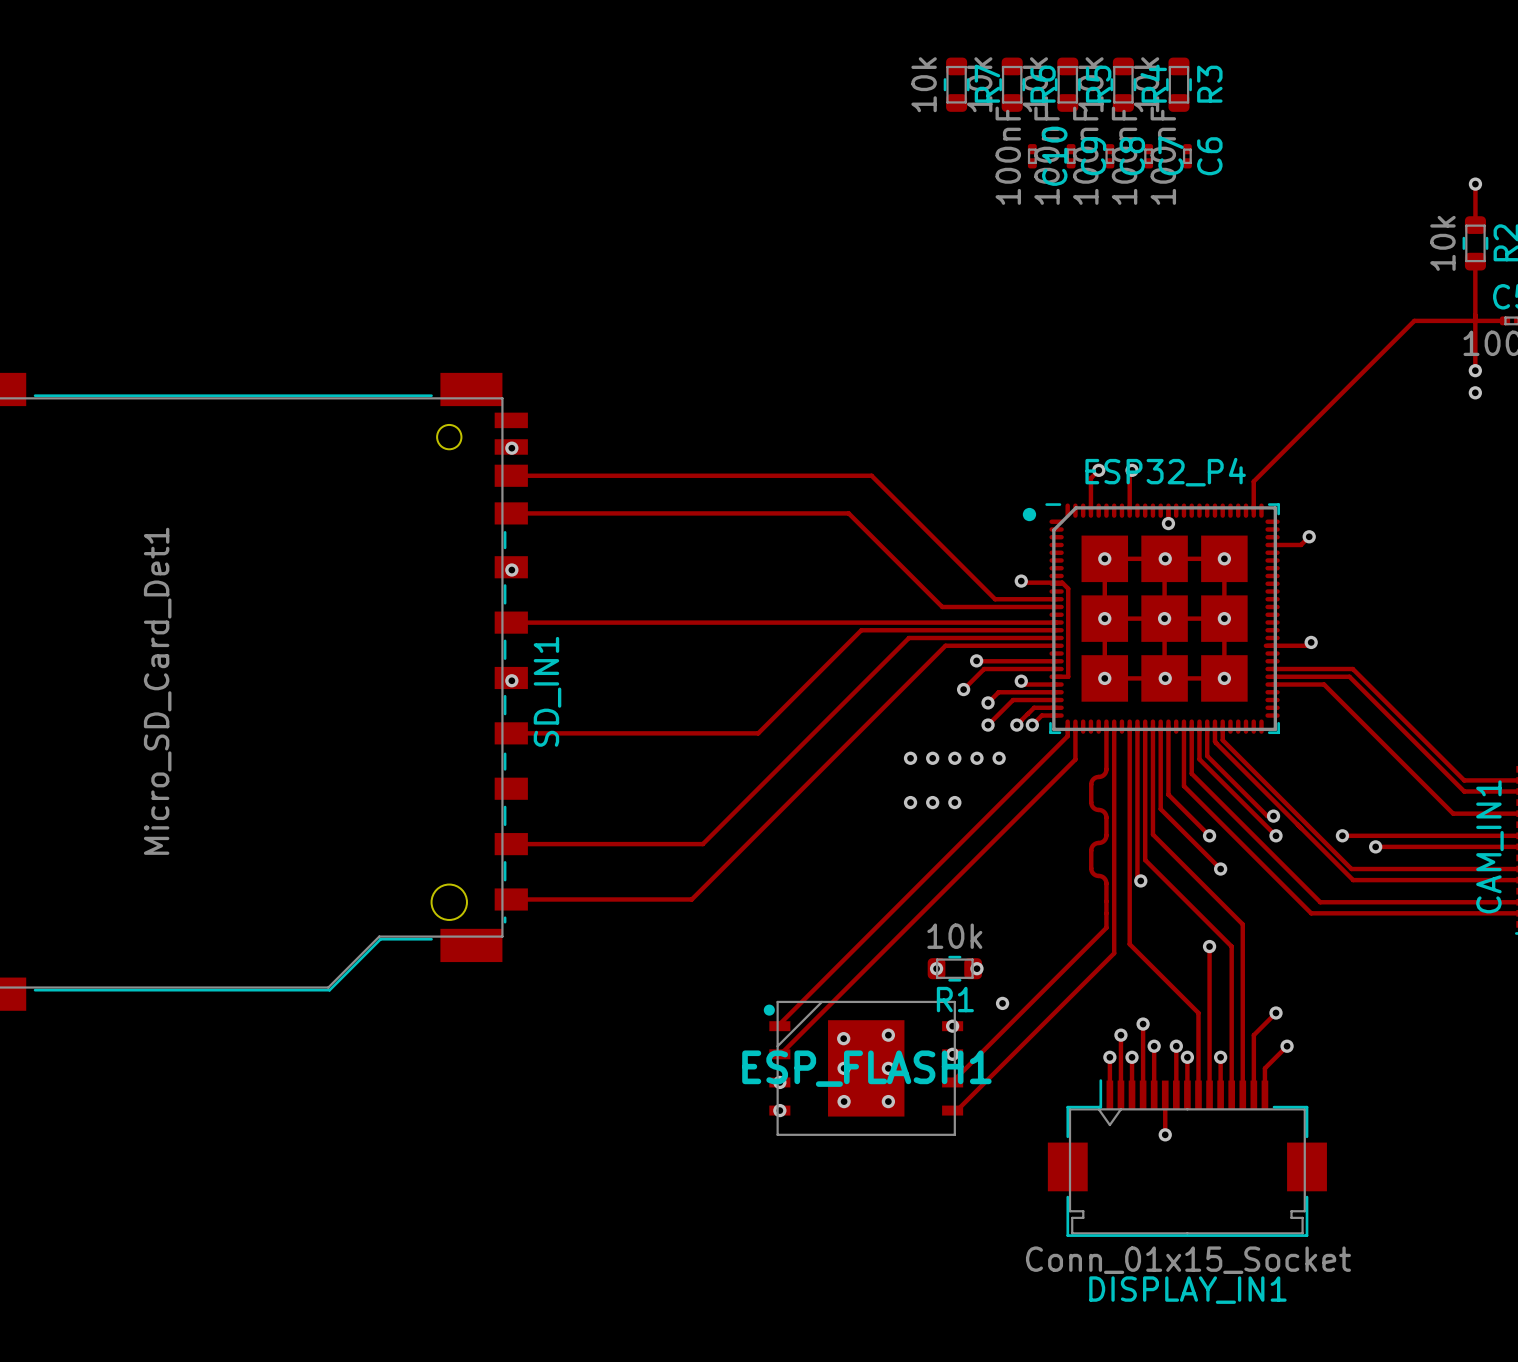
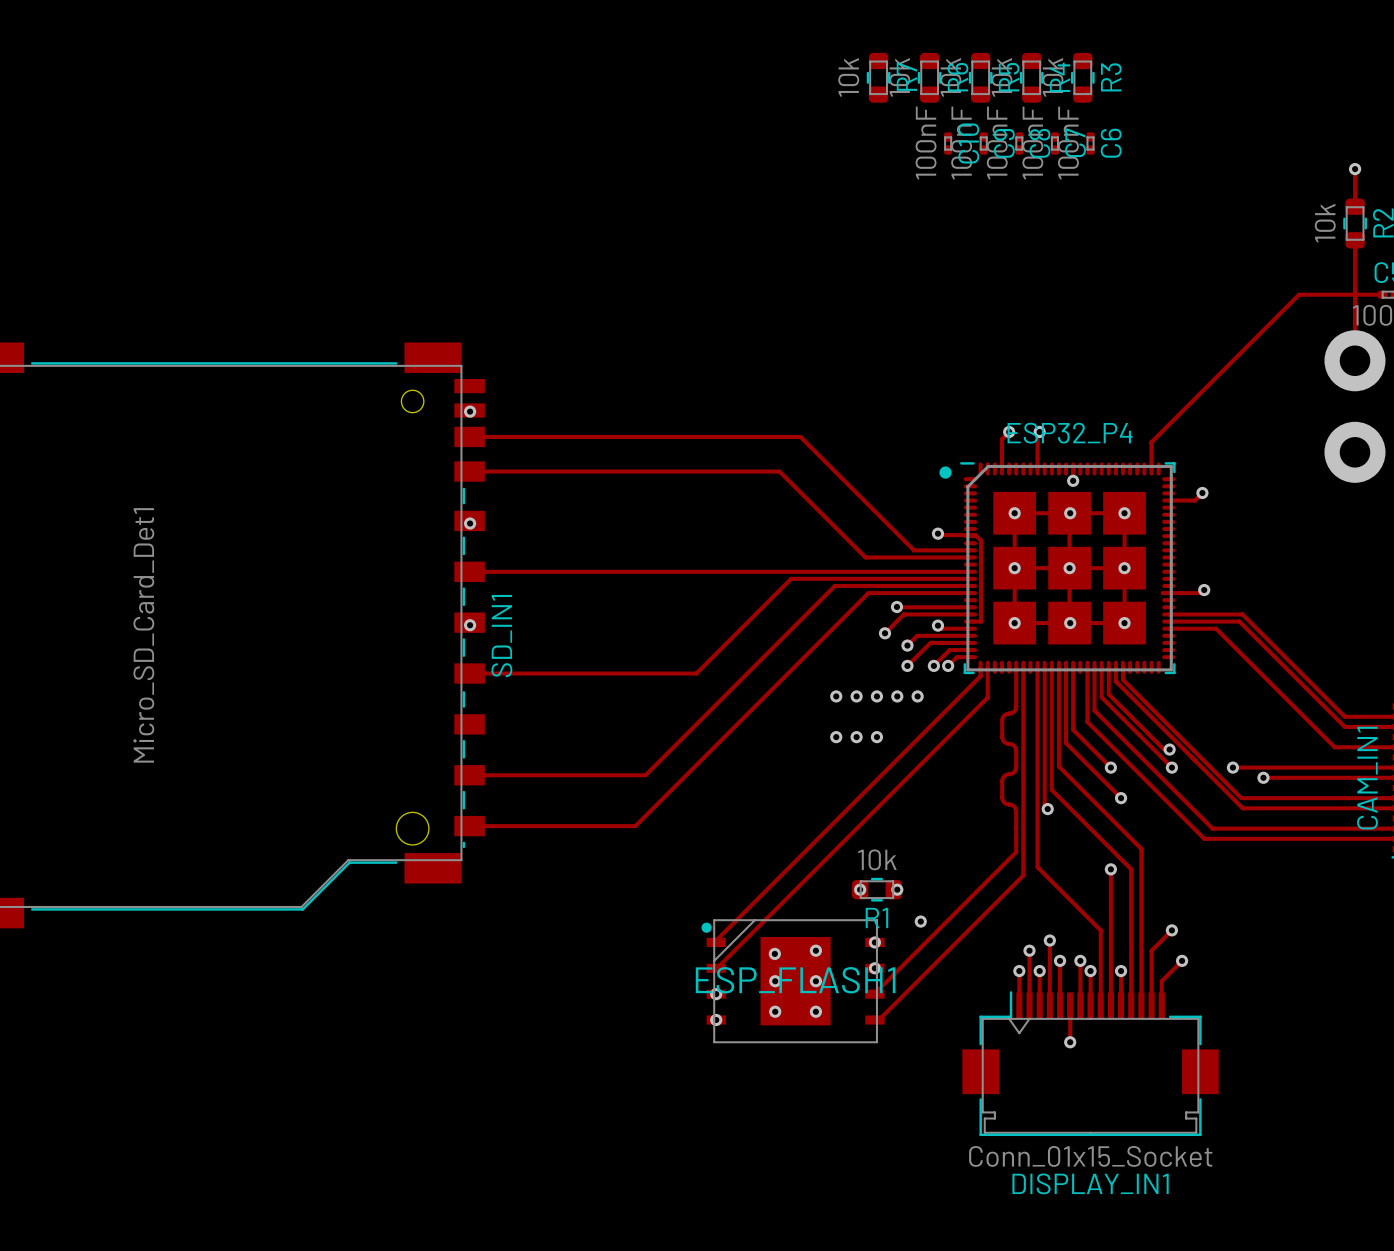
via: (1475, 370) -> none
via size: [1468, 386, 1482, 400] -> [1324, 330, 1386, 392]
via: none -> (1354, 452)

